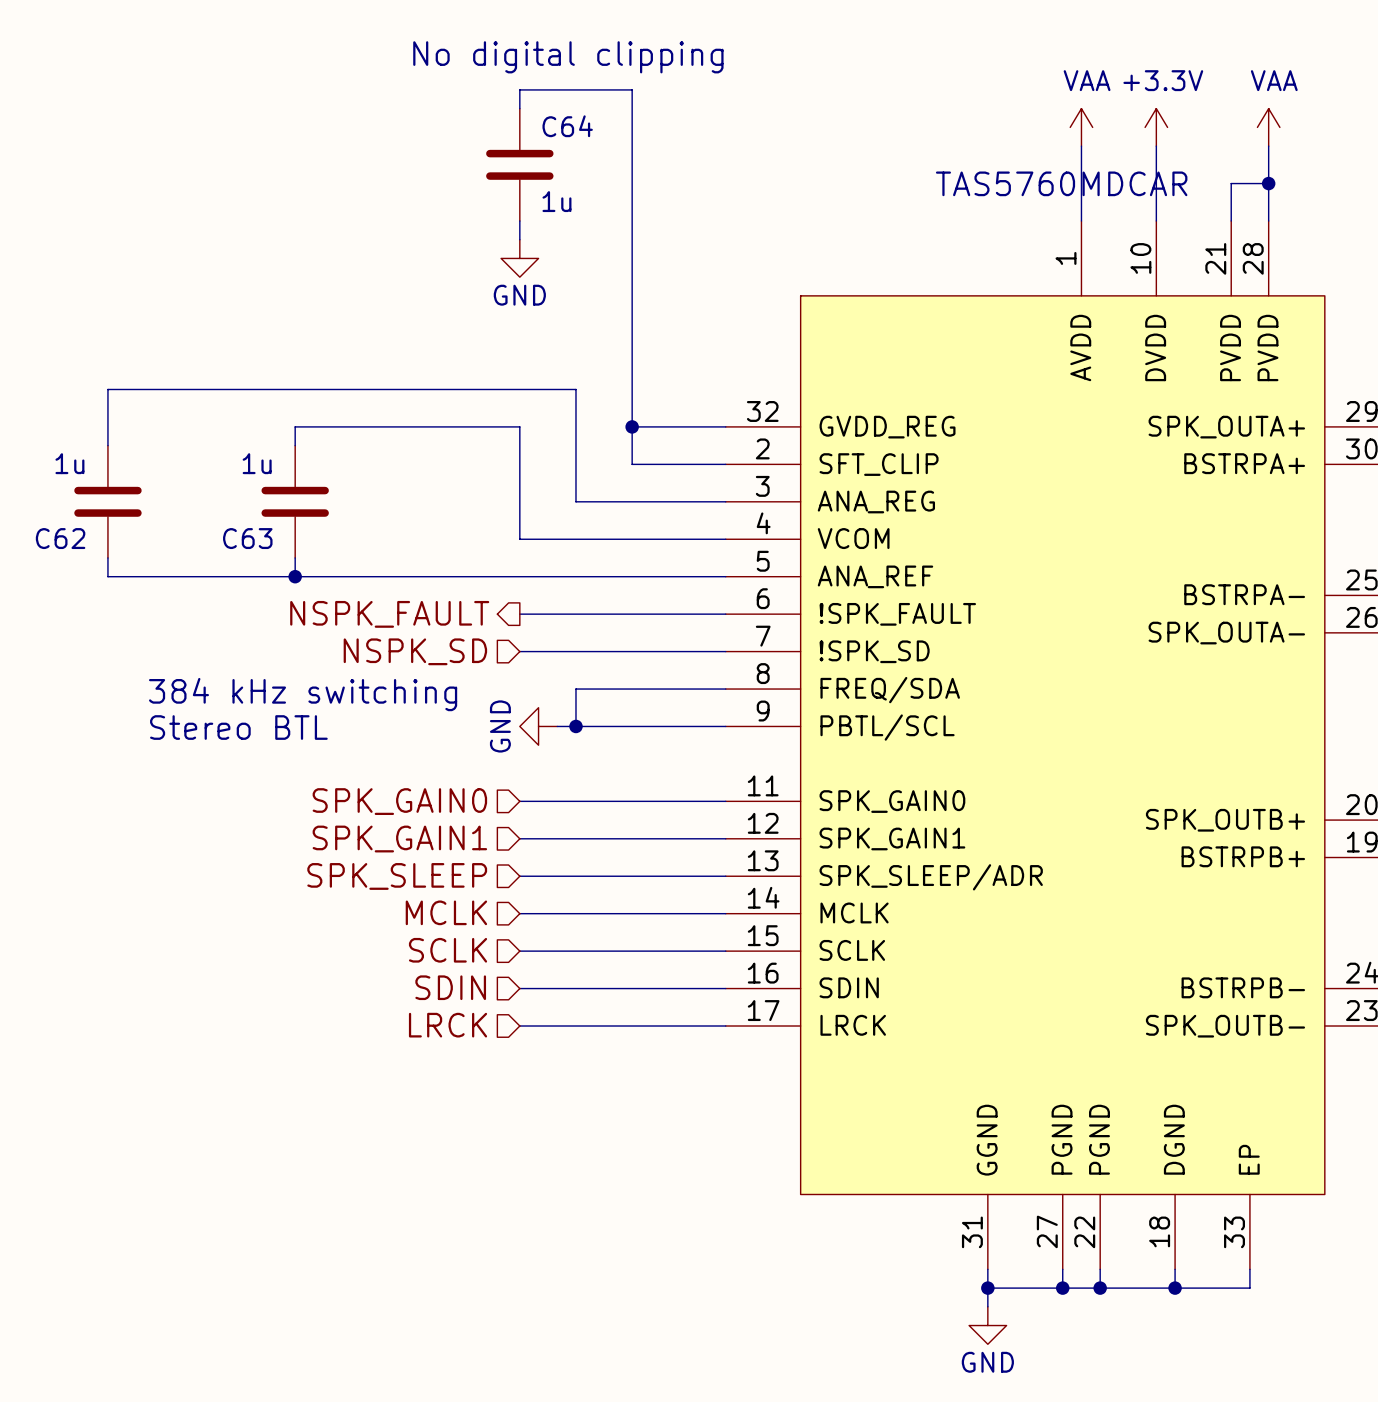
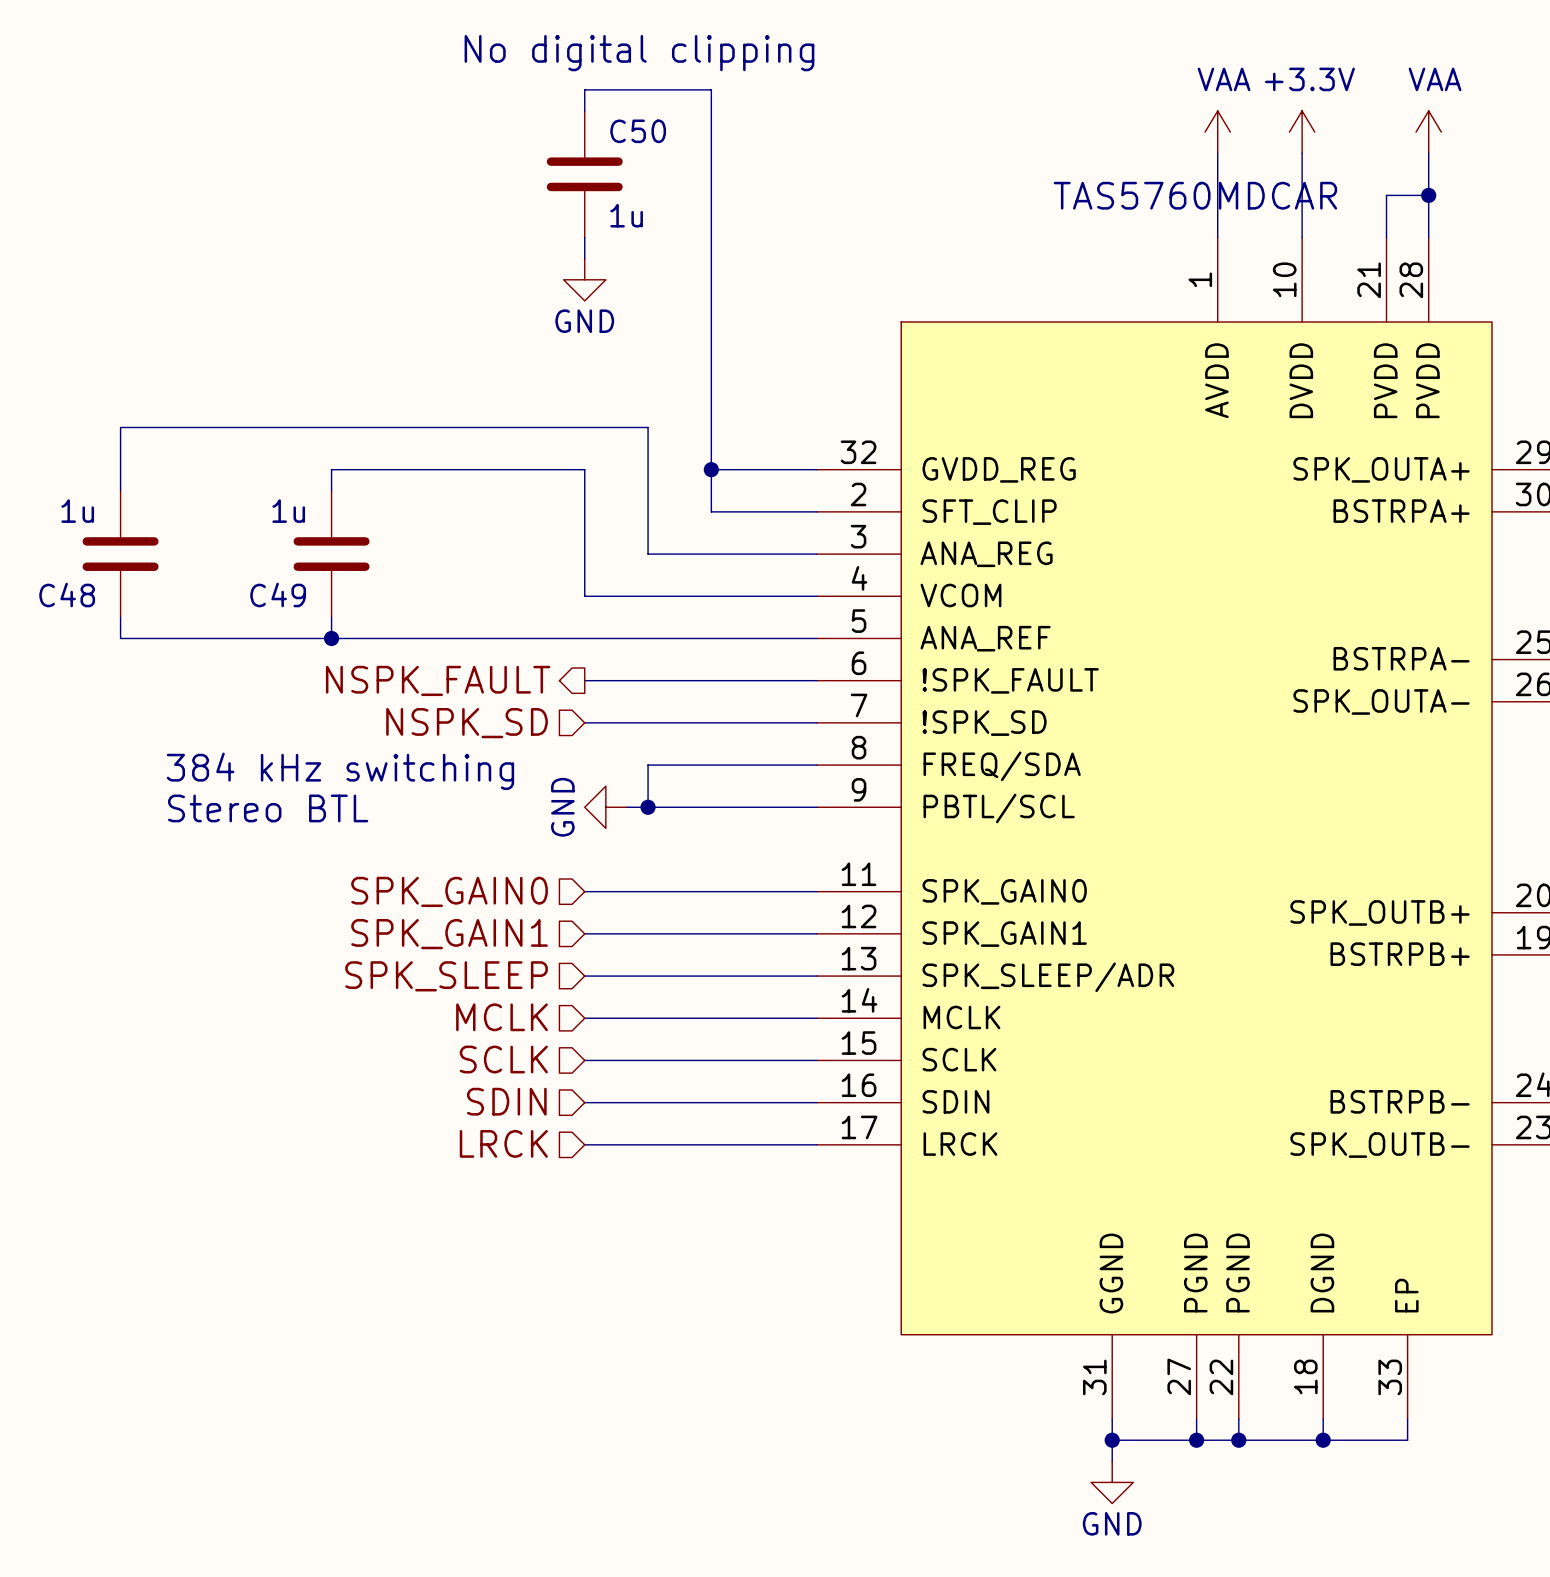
C64 name: C64 (567, 126) -> C50 (638, 131)
C62 name: C62 (60, 538) -> C48 (67, 594)
C63 name: C63 (247, 538) -> C49 (278, 594)

